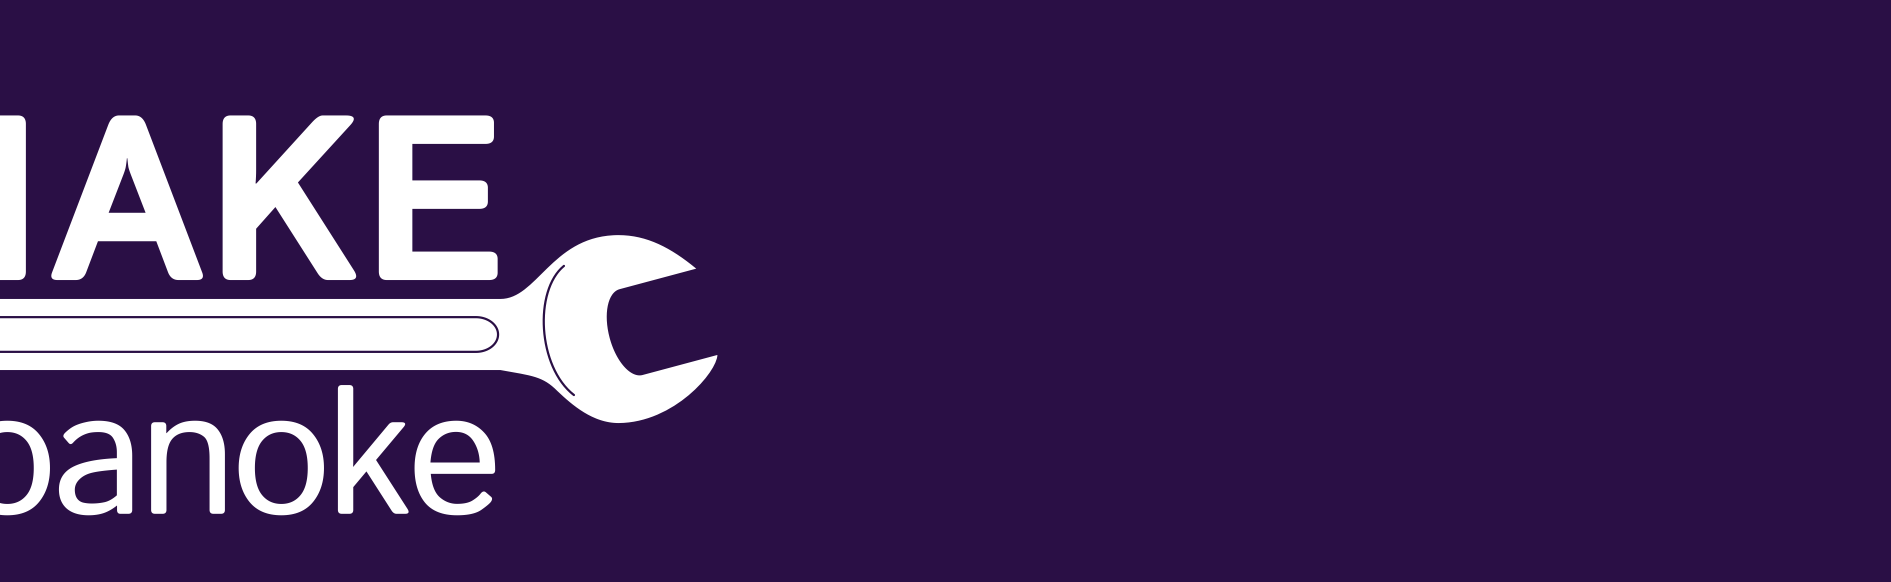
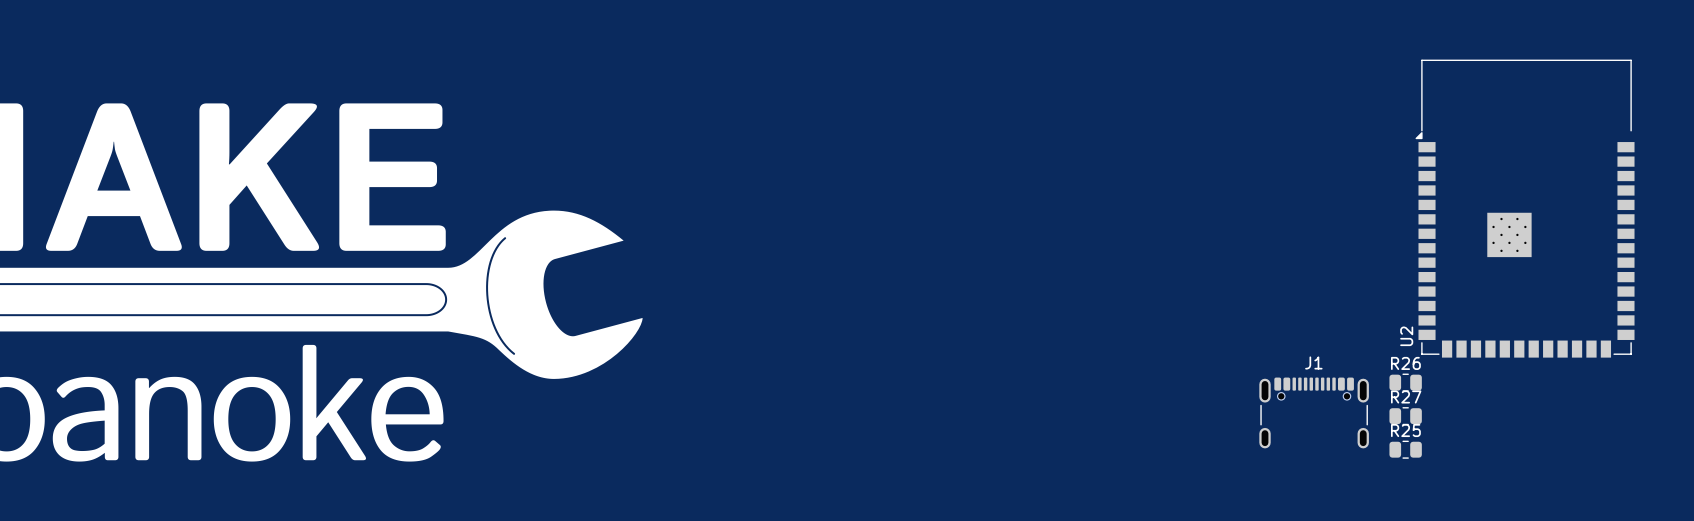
U2: none -> (1525, 208)
R26: none -> (1405, 382)
J1: none -> (1314, 412)
R27: none -> (1405, 416)
R25: none -> (1405, 449)

